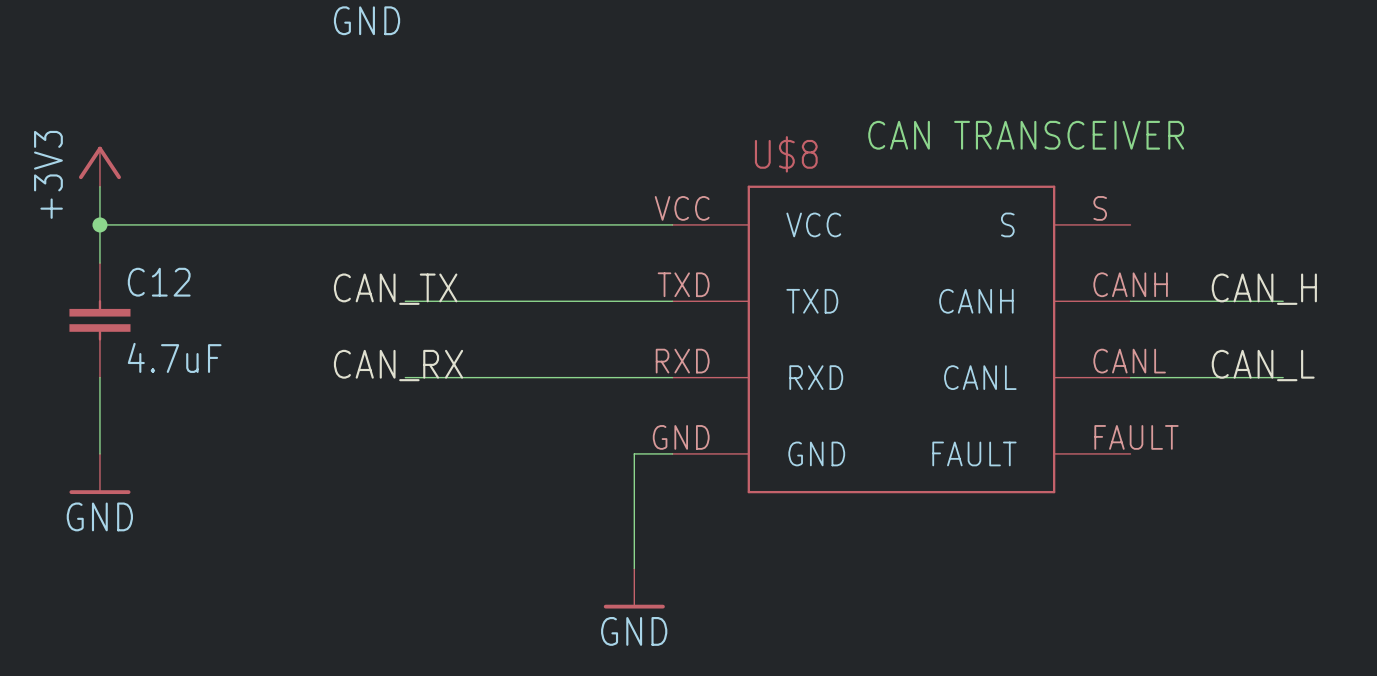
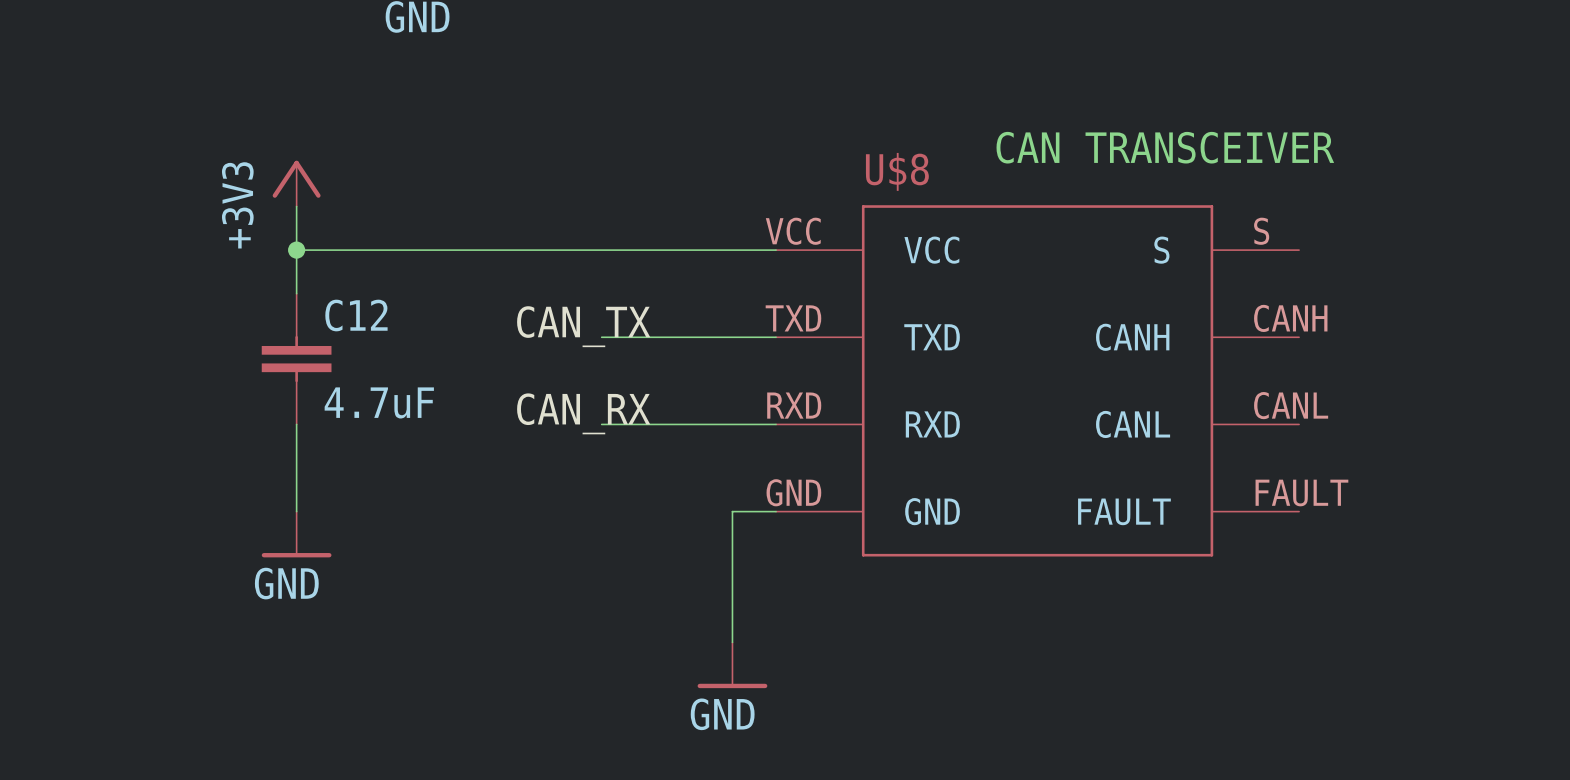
power symbol position: +3V3 (99, 166) -> +3V3 (296, 183)
wire: (99, 186) (99, 263) -> (296, 206) (296, 293)
wire: (99, 224) (252, 224) -> none
junction: (99, 224) -> none
junction: none -> (296, 250)
label position: CAN_TX (395, 289) -> CAN_TX (583, 326)
label: CAN_H (1264, 289) -> none
wire: (405, 301) (519, 301) -> none
wire: (1130, 301) (1283, 301) -> none
C12 position: (99, 320) -> (296, 359)
label position: CAN_RX (398, 365) -> CAN_RX (583, 413)
label: CAN_L (1263, 365) -> none
wire: (99, 377) (99, 453) -> (296, 424) (296, 511)
wire: (405, 377) (519, 377) -> none
wire: (1130, 377) (1283, 377) -> none
power symbol position: GND (99, 473) -> GND (296, 534)

